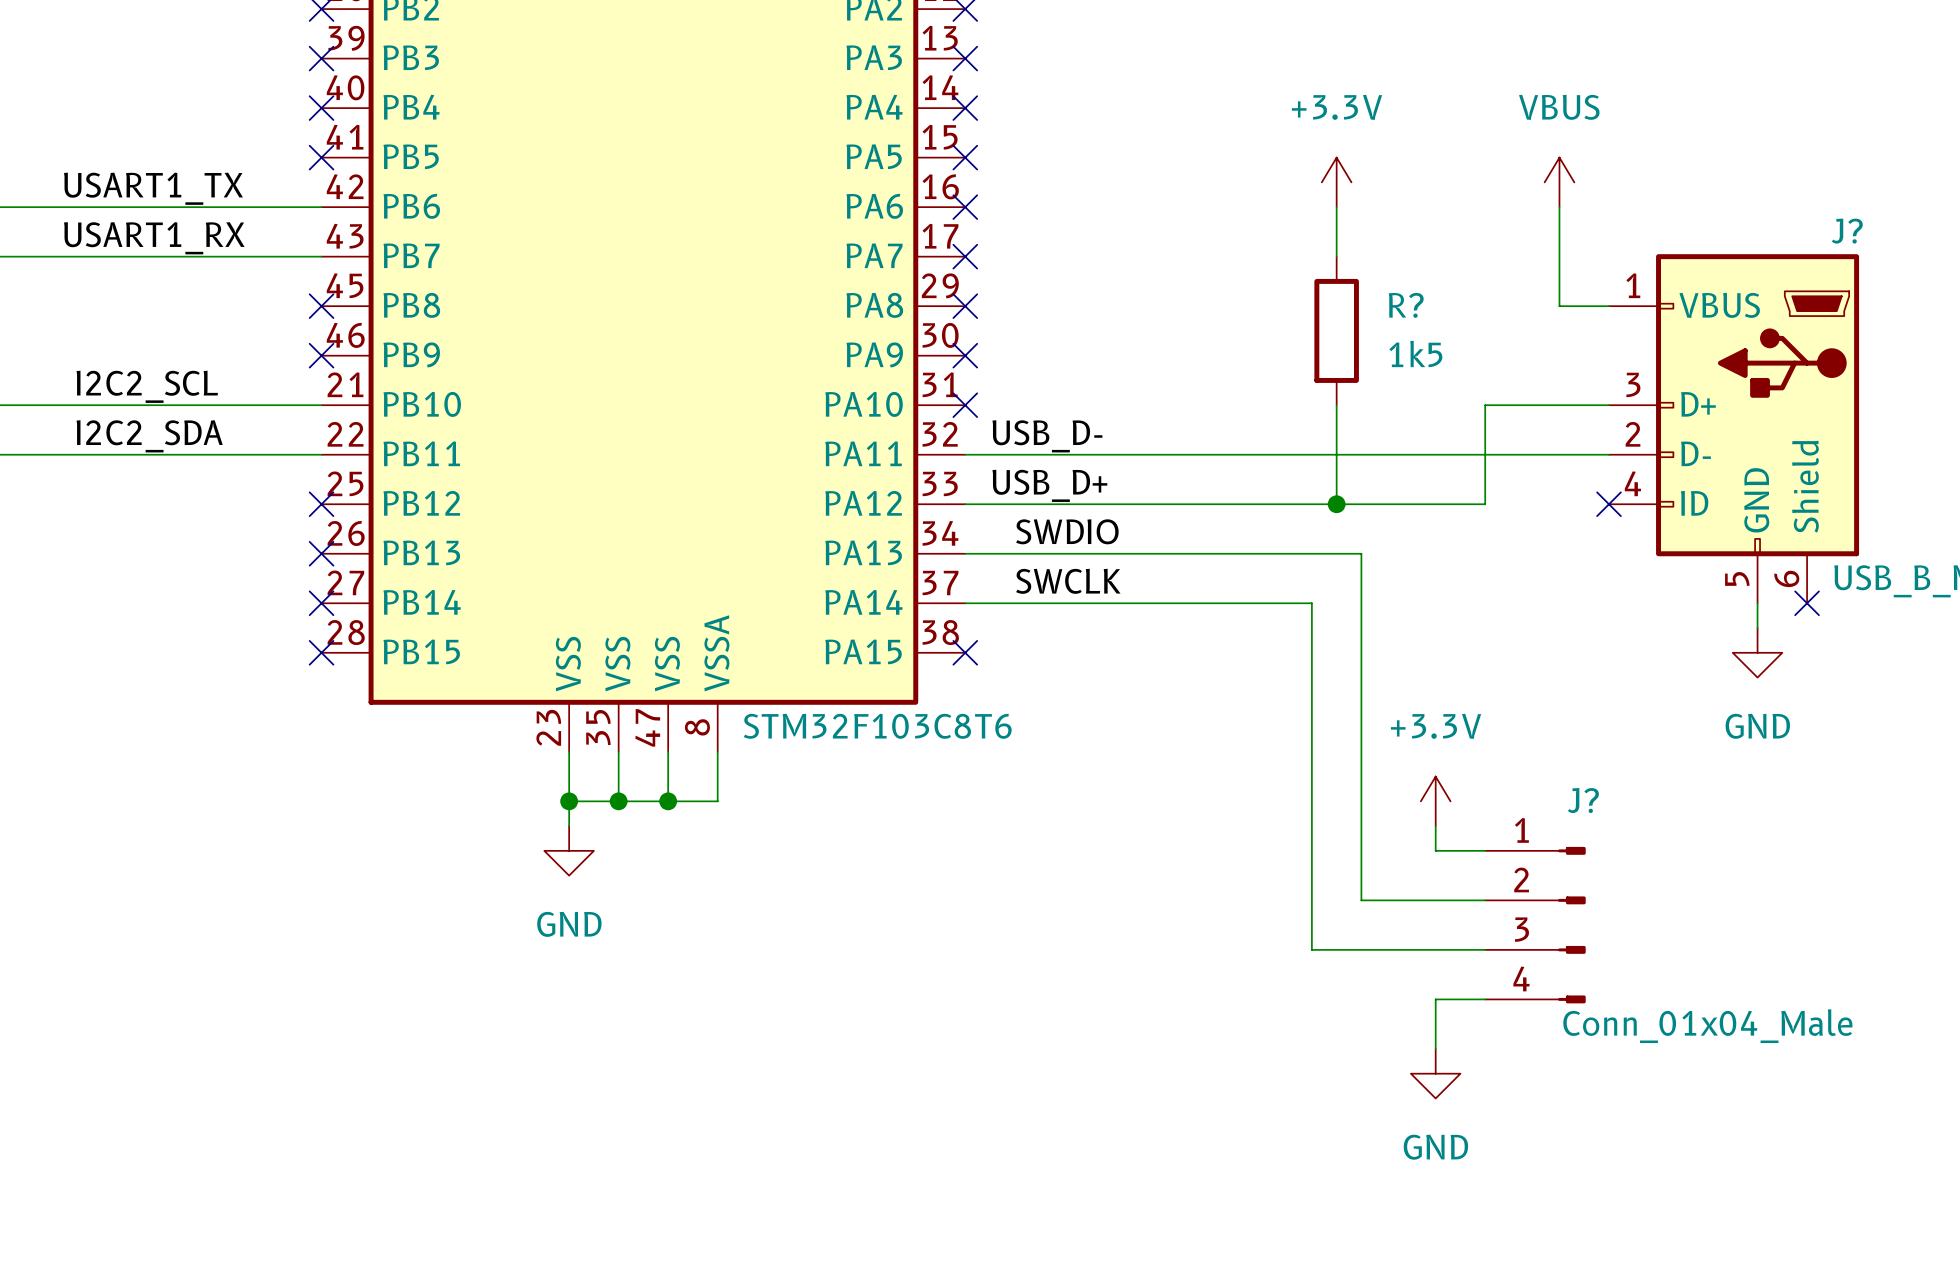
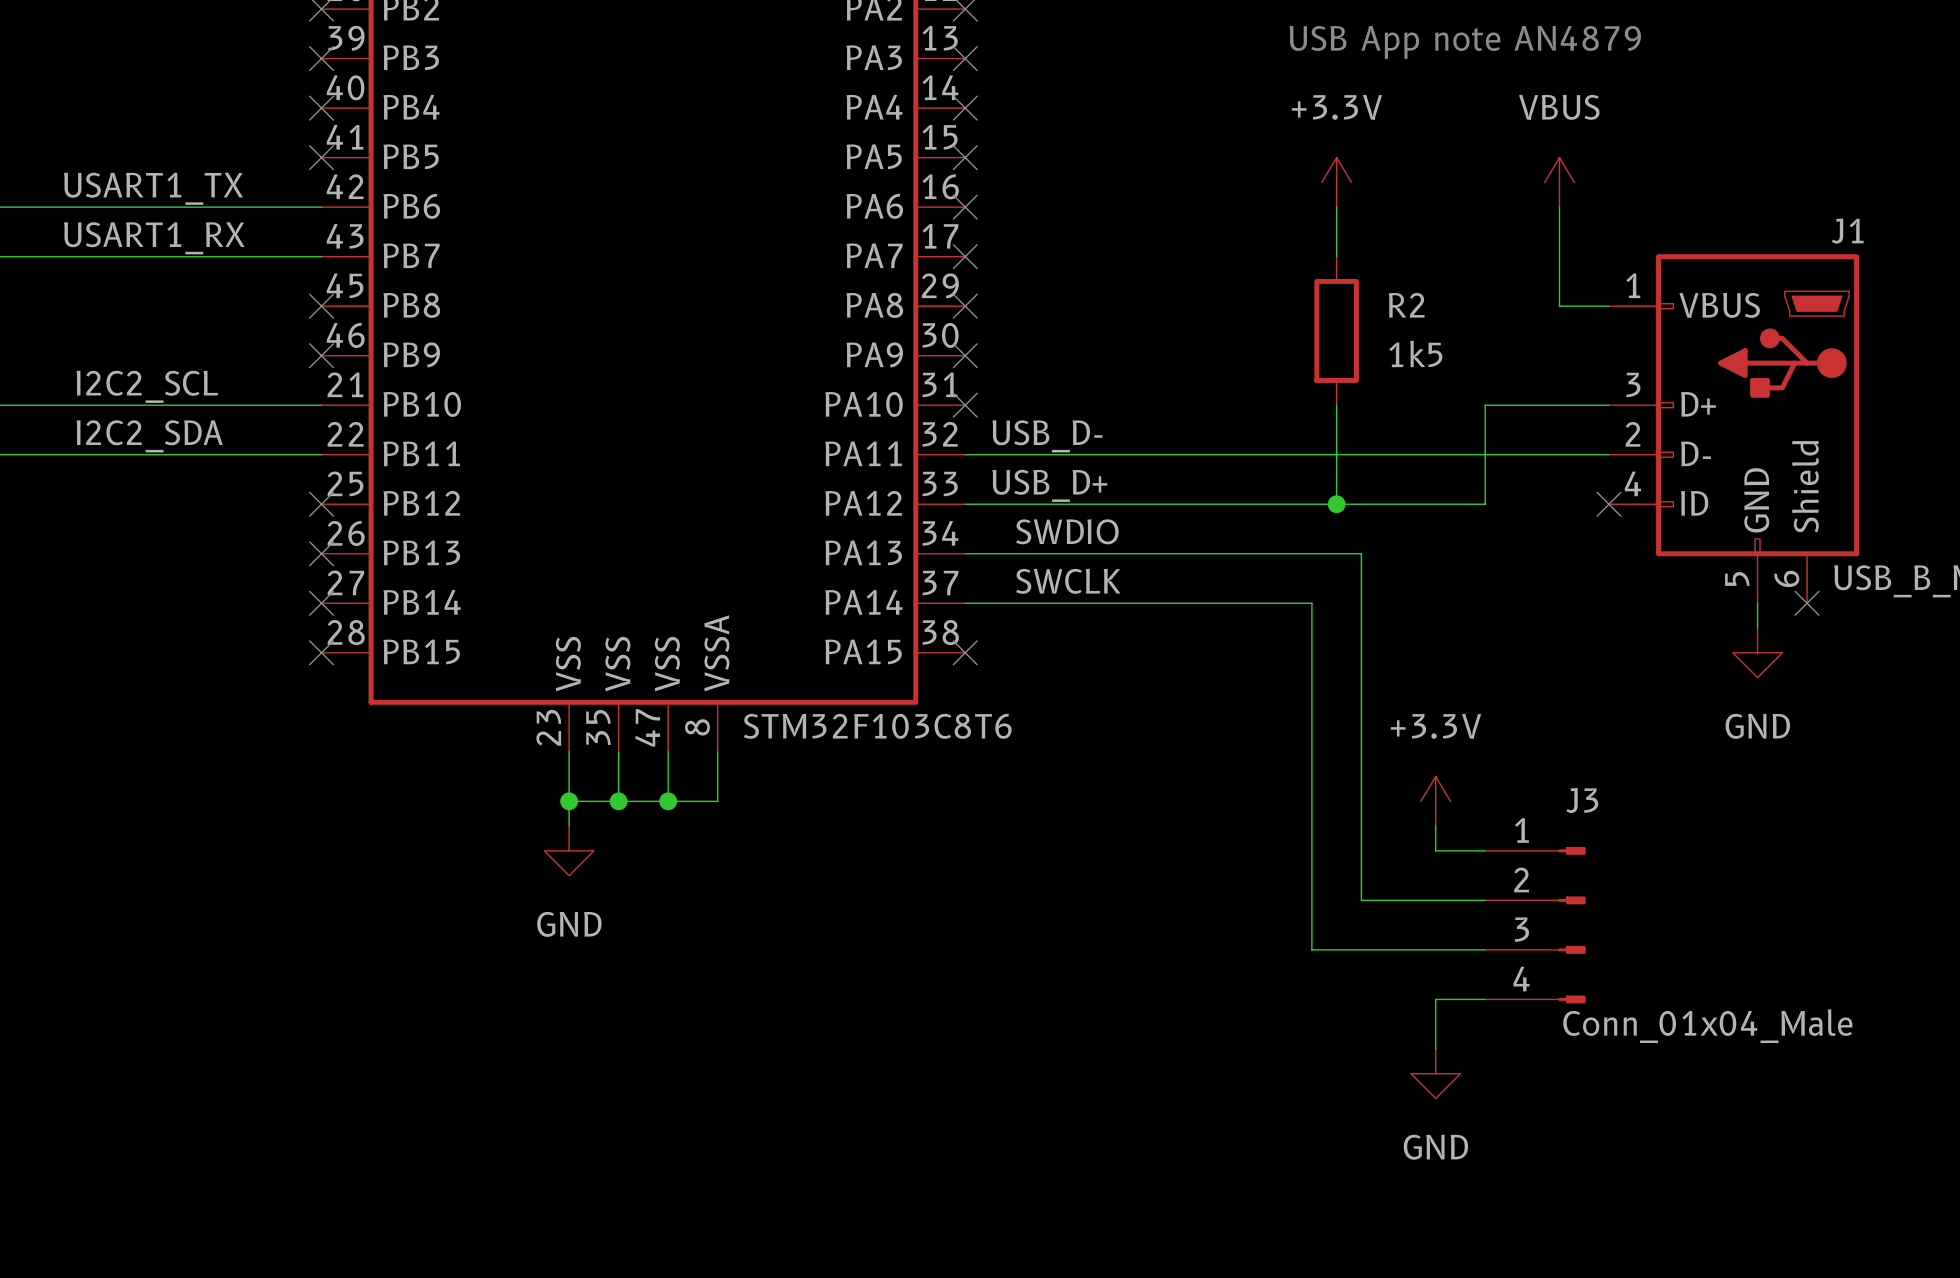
text: none -> USB App note AN4879 (1465, 42)
J? name: J? (1847, 231) -> J1 (1847, 231)
R? name: R? (1406, 305) -> R2 (1406, 305)
J? name: J? (1583, 800) -> J3 (1582, 800)

